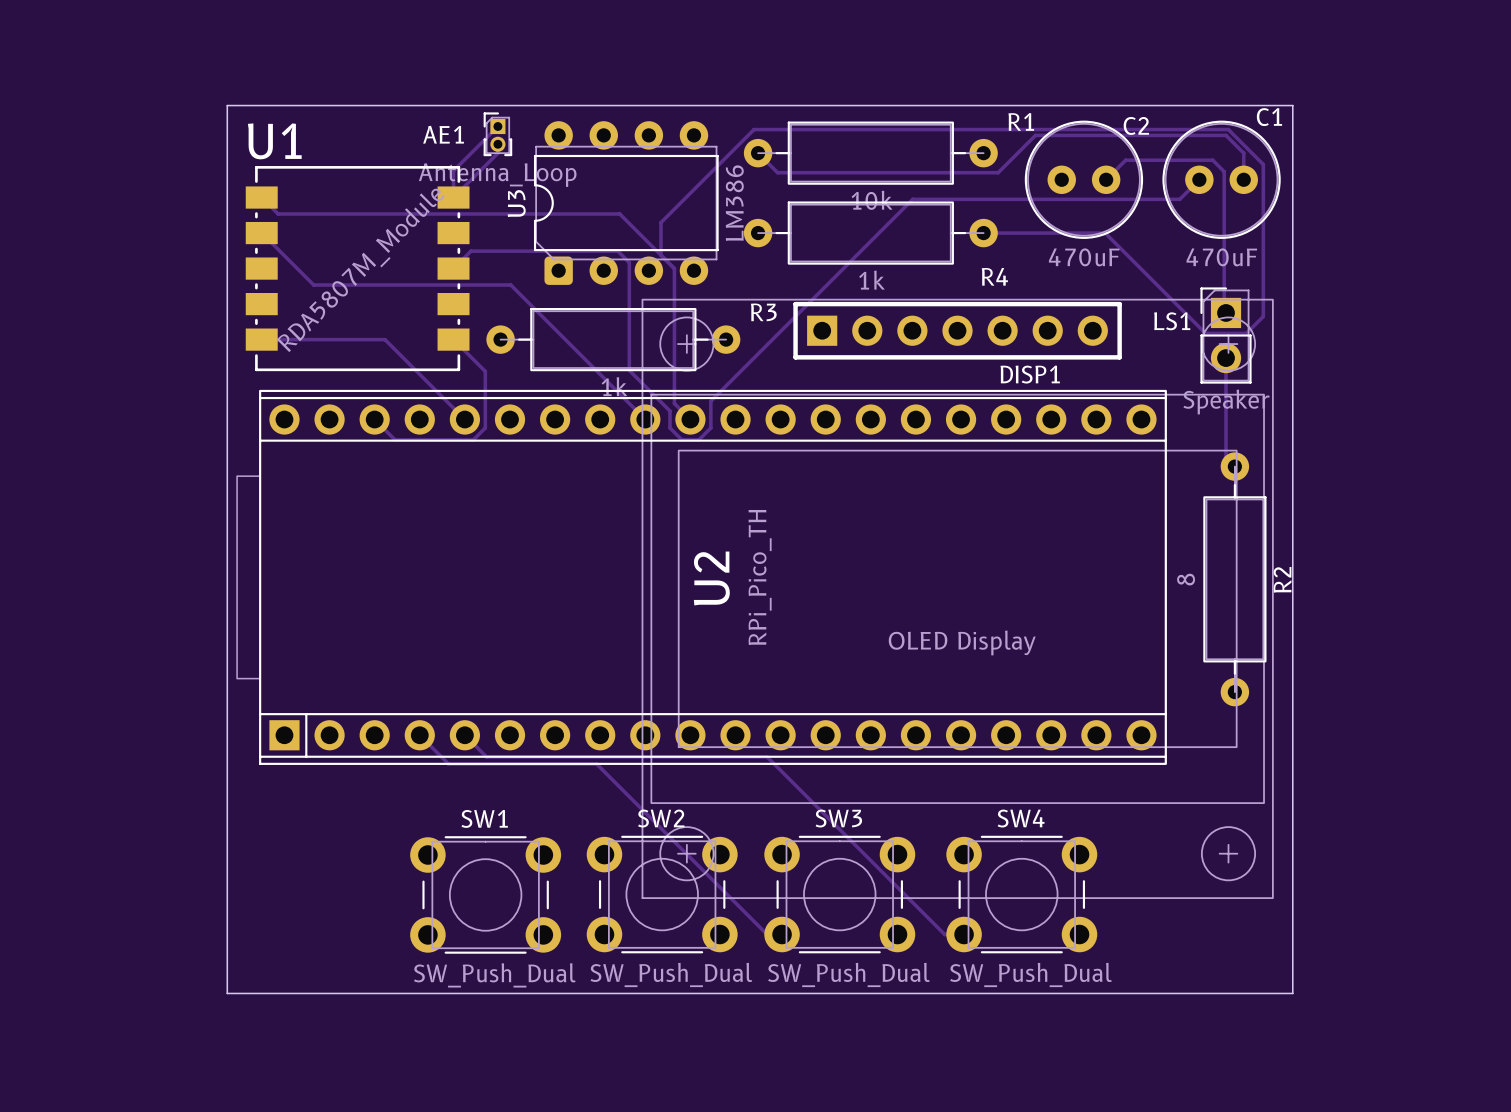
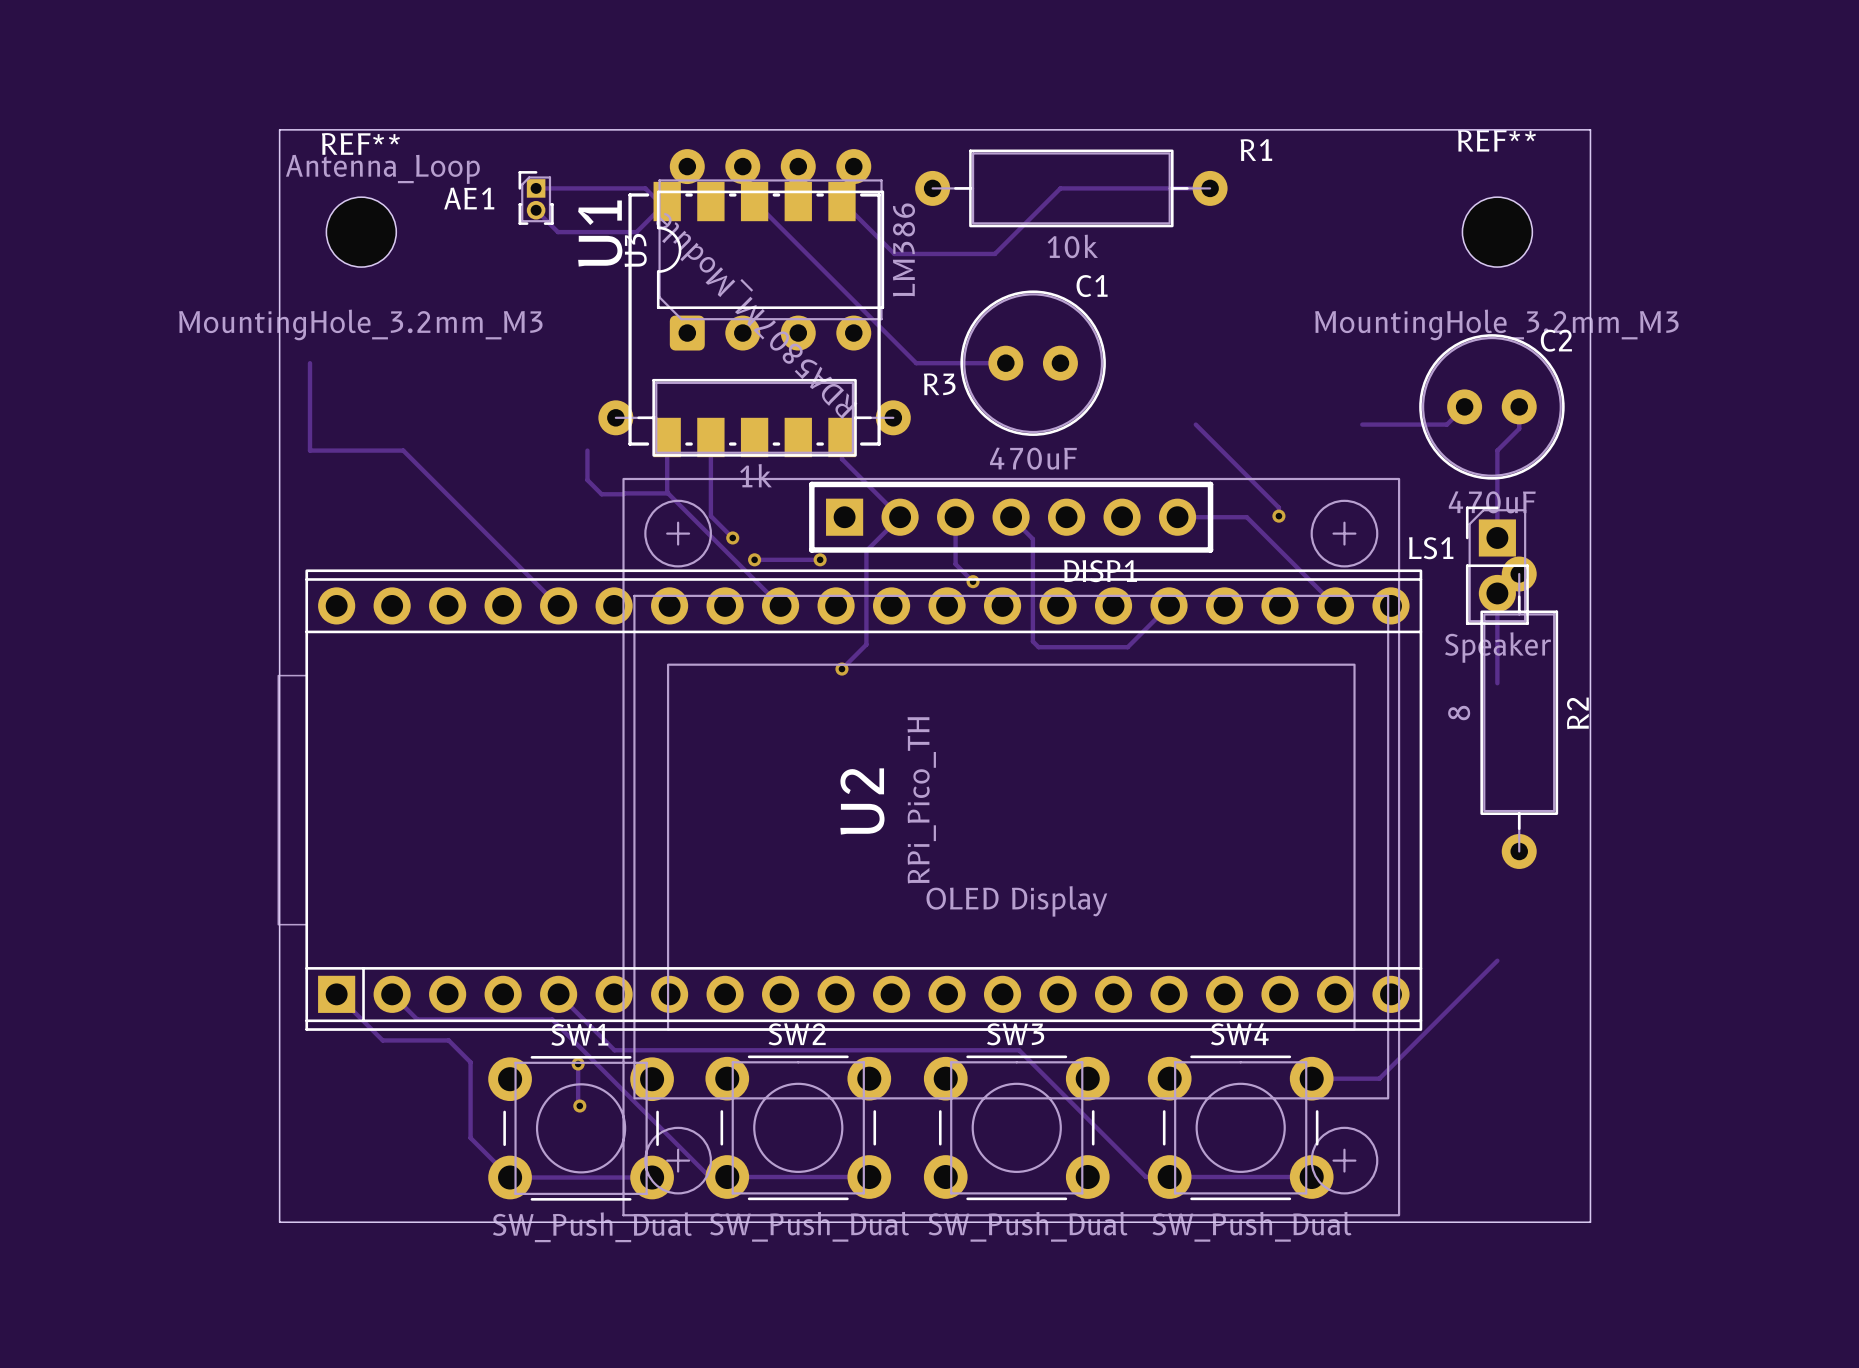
track: (497, 126) (453, 170) (453, 197) (497, 153) (497, 144) -> none
AE1 position: (497, 134) -> (536, 197)
U1 name position: U1 (274, 141) -> U1 (600, 233)
track: none -> (536, 188) (645, 188) (658, 201) (667, 201) (636, 232) (557, 232) (536, 210)
track: none -> (1199, 188) (1060, 188) (994, 253) (894, 253) (841, 201)
track: (758, 161) (758, 153) (777, 172) (998, 172) (1035, 135) (1226, 135) (1243, 153) (1243, 179) -> none
track: none -> (754, 201) (916, 363) (1005, 363)
AE1 value position: Antenna_Loop (497, 175) -> Antenna_Loop (382, 169)
C2 position: (1083, 179) -> (1491, 406)
track: (1106, 179) (1125, 160) (1212, 160) (1224, 171) (1224, 311) (1226, 312) -> none
track: (1199, 179) (1179, 199) (912, 199) (710, 401) (710, 427) (698, 439) (681, 439) (669, 427) (669, 411) (629, 370) (629, 262) (617, 251) (470, 251) (453, 268) -> none
C1 position: (1221, 179) -> (1033, 363)
REF**: none -> MountingHole_3.2mm_M3 (361, 232)
REF**: none -> MountingHole_3.2mm_M3 (1497, 232)
track: (261, 197) (278, 213) (619, 213) (674, 268) (674, 403) (690, 419) -> none
track: (261, 233) (313, 285) (510, 285) (645, 419) -> none
R4: 1k (870, 233) -> none
track: (983, 233) (1105, 233) (1205, 333) (1246, 333) (1263, 316) (1263, 164) (1228, 129) (754, 129) (660, 222) (660, 255) -> none
U1 rotation: 0° (357, 268) -> 90° clockwise (754, 319)
U1 position: (357, 268) -> (754, 319)
track: none -> (309, 363) (309, 450) (403, 450) (558, 605)
track: none -> (1464, 406) (1446, 424) (1362, 424)
track: none -> (1519, 406) (1519, 428) (1497, 450) (1497, 537)
LS1 position: (1226, 335) -> (1497, 565)
track: (261, 339) (384, 339) (464, 419) -> none
track: (453, 339) (485, 371) (485, 427) (473, 439) (395, 439) (374, 419) -> none
track: none -> (1195, 424) (1278, 507) (1278, 516)
track: none -> (667, 437) (667, 492) (780, 605)
track: none -> (710, 437) (710, 516) (732, 537)
track: none -> (841, 437) (841, 459) (900, 517) (866, 550) (866, 644) (841, 669)
track: (1226, 358) (1226, 457) (1234, 466) -> none
track: none -> (587, 450) (587, 480) (601, 494) (668, 493)
via: none -> (1278, 516)
track: none -> (955, 517) (955, 564) (973, 581)
track: none -> (1011, 517) (1032, 539) (1032, 641) (1038, 647) (1127, 647) (1169, 605)
track: none -> (1177, 517) (1246, 517) (1335, 605)
via: none -> (732, 537)
track: none -> (754, 559) (820, 559)
via: none -> (754, 559)
via: none -> (820, 559)
via: none -> (973, 581)
track: none -> (1497, 593) (1497, 683)
via: none -> (841, 669)
U2 position: (701, 577) -> (850, 800)
DISP1 position: (957, 598) -> (1011, 847)
track: (419, 735) (448, 764) (596, 764) (767, 934) (782, 934) -> none
track: (464, 735) (486, 756) (767, 756) (944, 934) (964, 934) -> none
track: none -> (1497, 960) (1379, 1078) (1311, 1078)
track: none -> (336, 994) (382, 1040) (448, 1040) (470, 1062) (470, 1138) (510, 1177) (652, 1177)
track: none -> (392, 994) (417, 1019) (552, 1019) (709, 1177) (869, 1177)
track: none -> (558, 994) (614, 1050) (1019, 1050) (1145, 1177) (1311, 1177)
track: none -> (578, 1063) (578, 1104) (579, 1106)
via: none -> (578, 1063)
SW1 position: (485, 894) -> (581, 1128)
SW2 position: (662, 894) -> (798, 1127)
SW3 position: (839, 894) -> (1016, 1127)
SW4 position: (1021, 894) -> (1240, 1127)
via: none -> (579, 1106)

